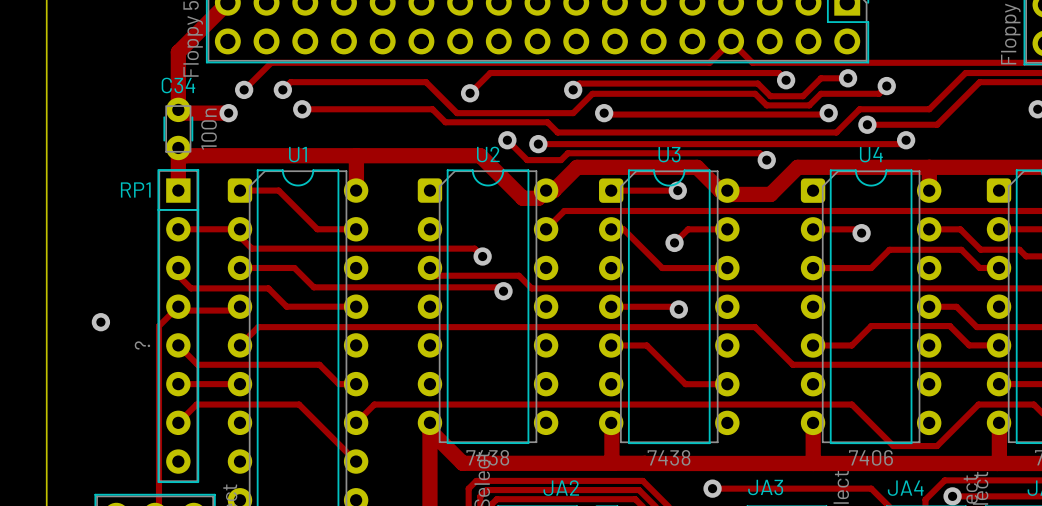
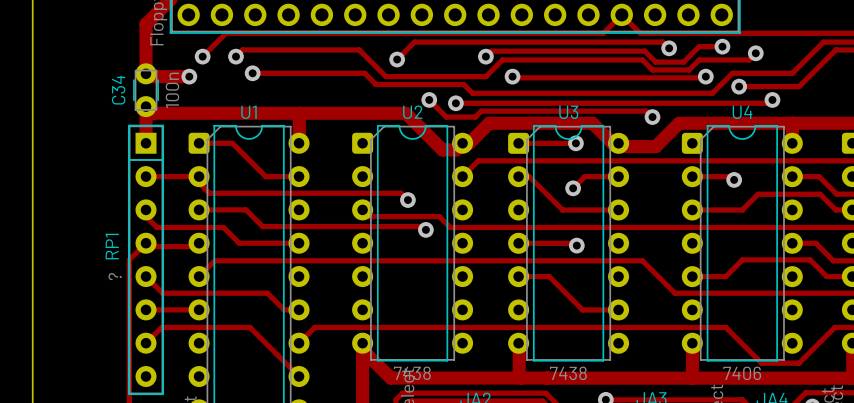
C34 name rotation: 0° (178, 85) -> 90° counterclockwise (118, 90)
RP1 name rotation: 0° (135, 189) -> 90° counterclockwise (112, 246)
RP1 name position: RP1 (135, 189) -> RP1 (112, 246)
via: (100, 322) -> none

